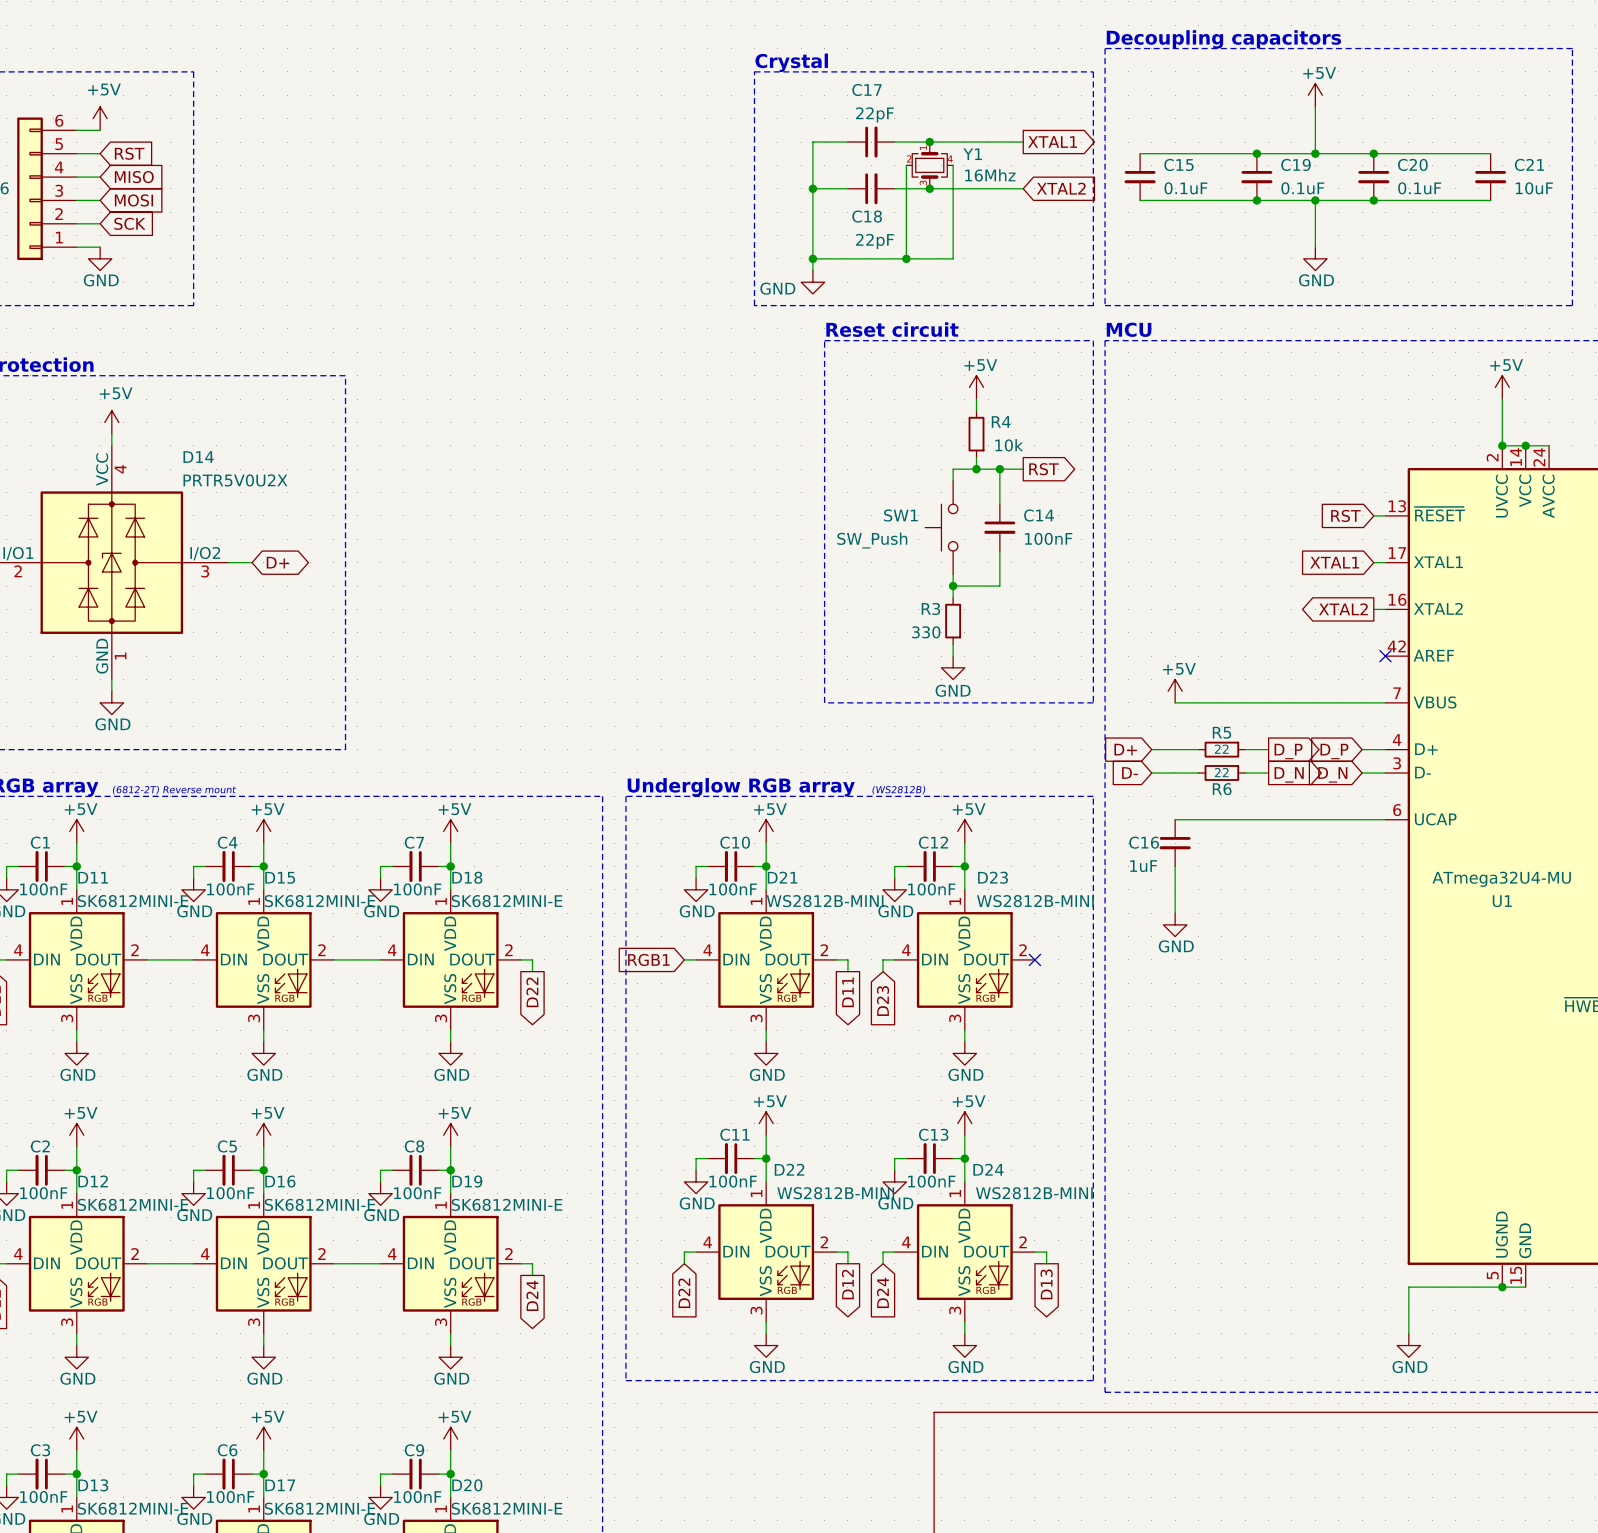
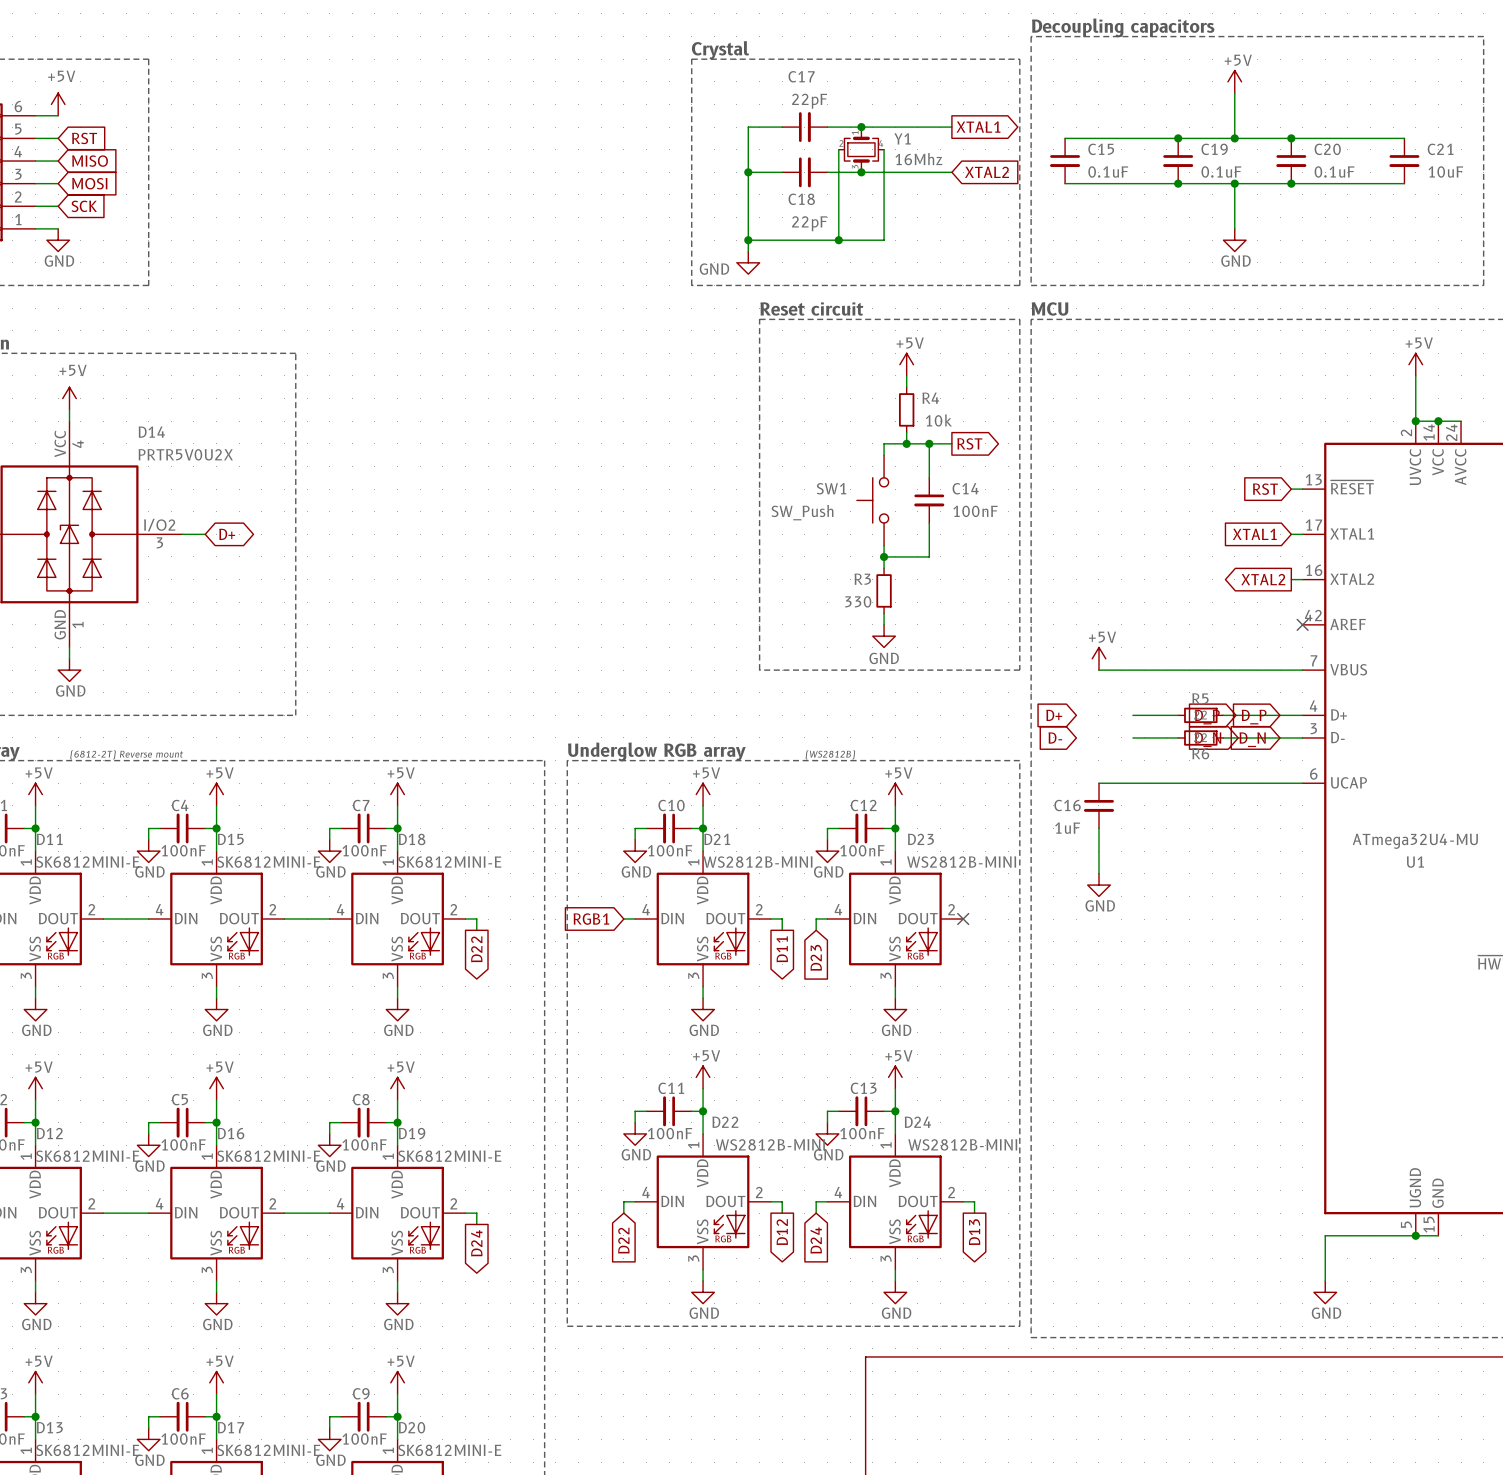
wire: (1151, 749) (1198, 749) -> none
wire: none -> (1132, 715) (1166, 715)
R5 position: (1221, 749) -> (1200, 715)
wire: none -> (1223, 715) (1280, 715)
wire: (1151, 772) (1198, 772) -> none
wire: none -> (1132, 737) (1166, 737)
R6 position: (1221, 772) -> (1200, 737)
wire: none -> (1223, 737) (1280, 737)

